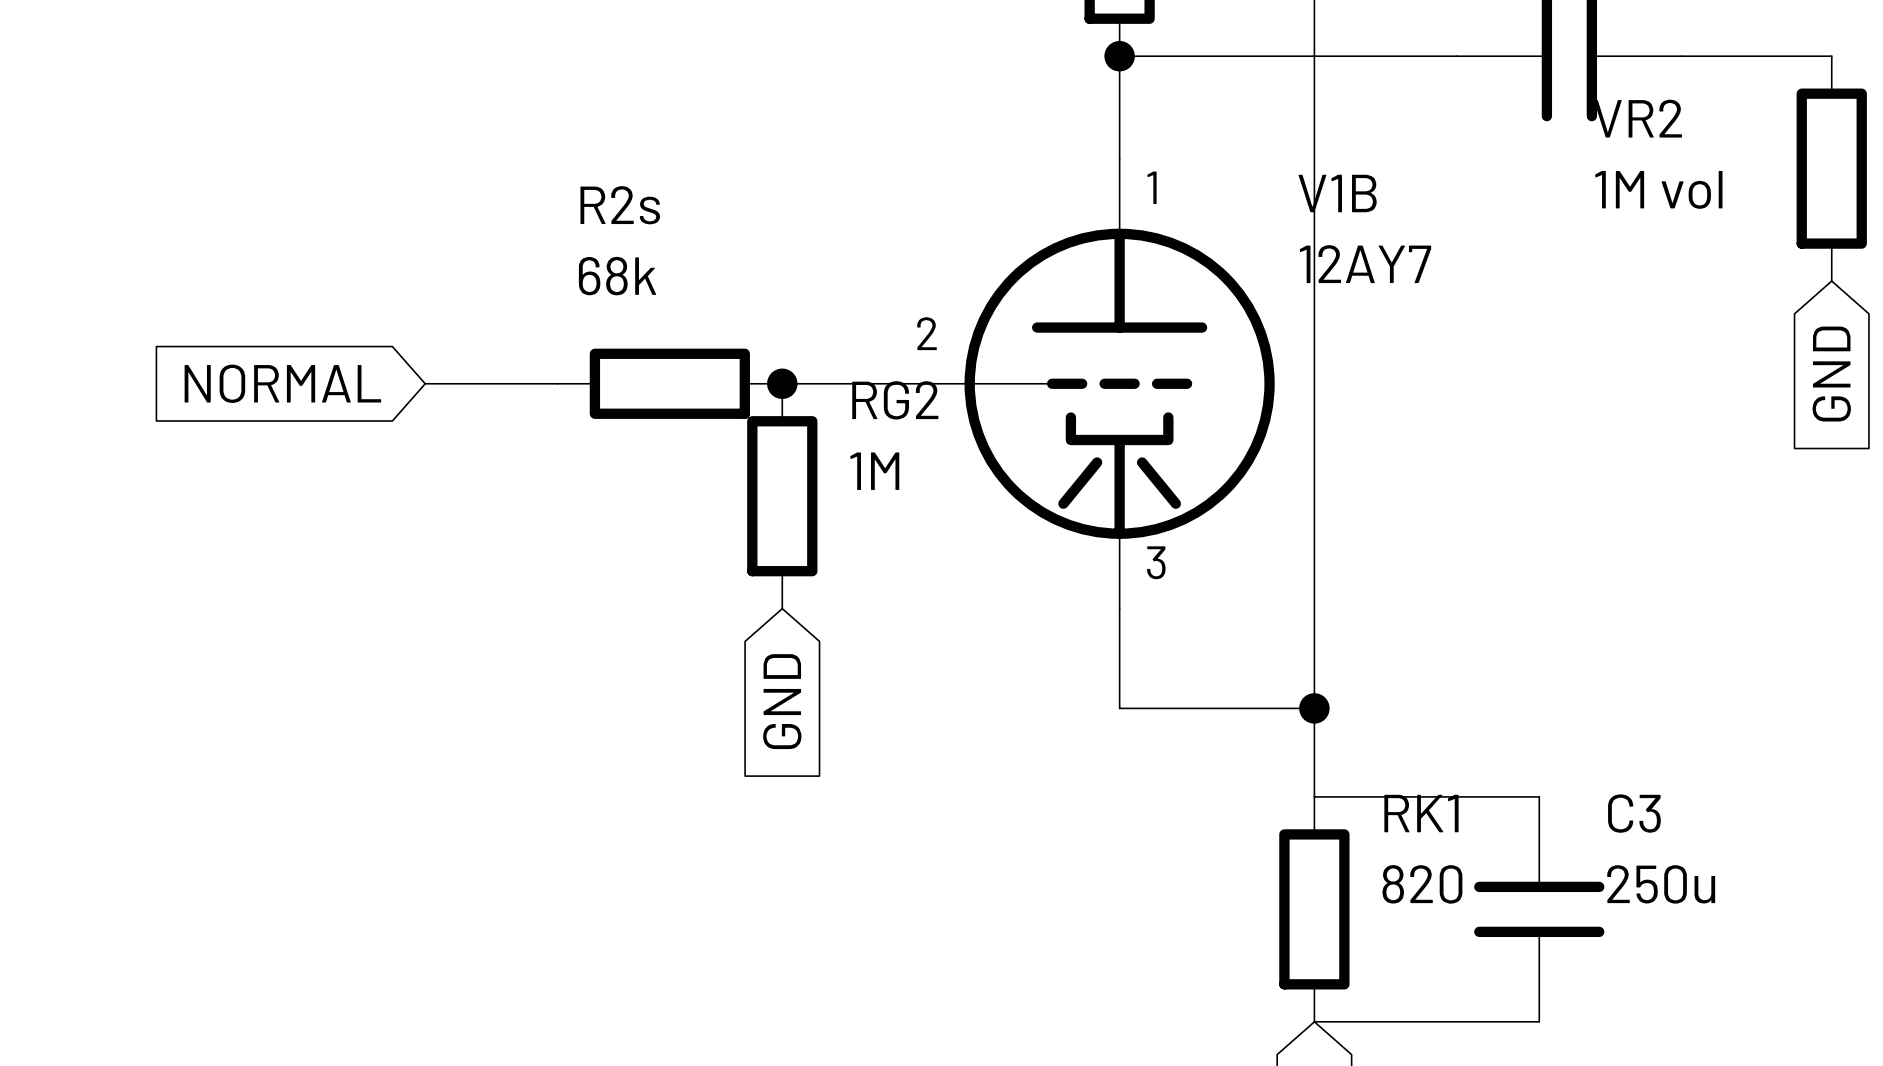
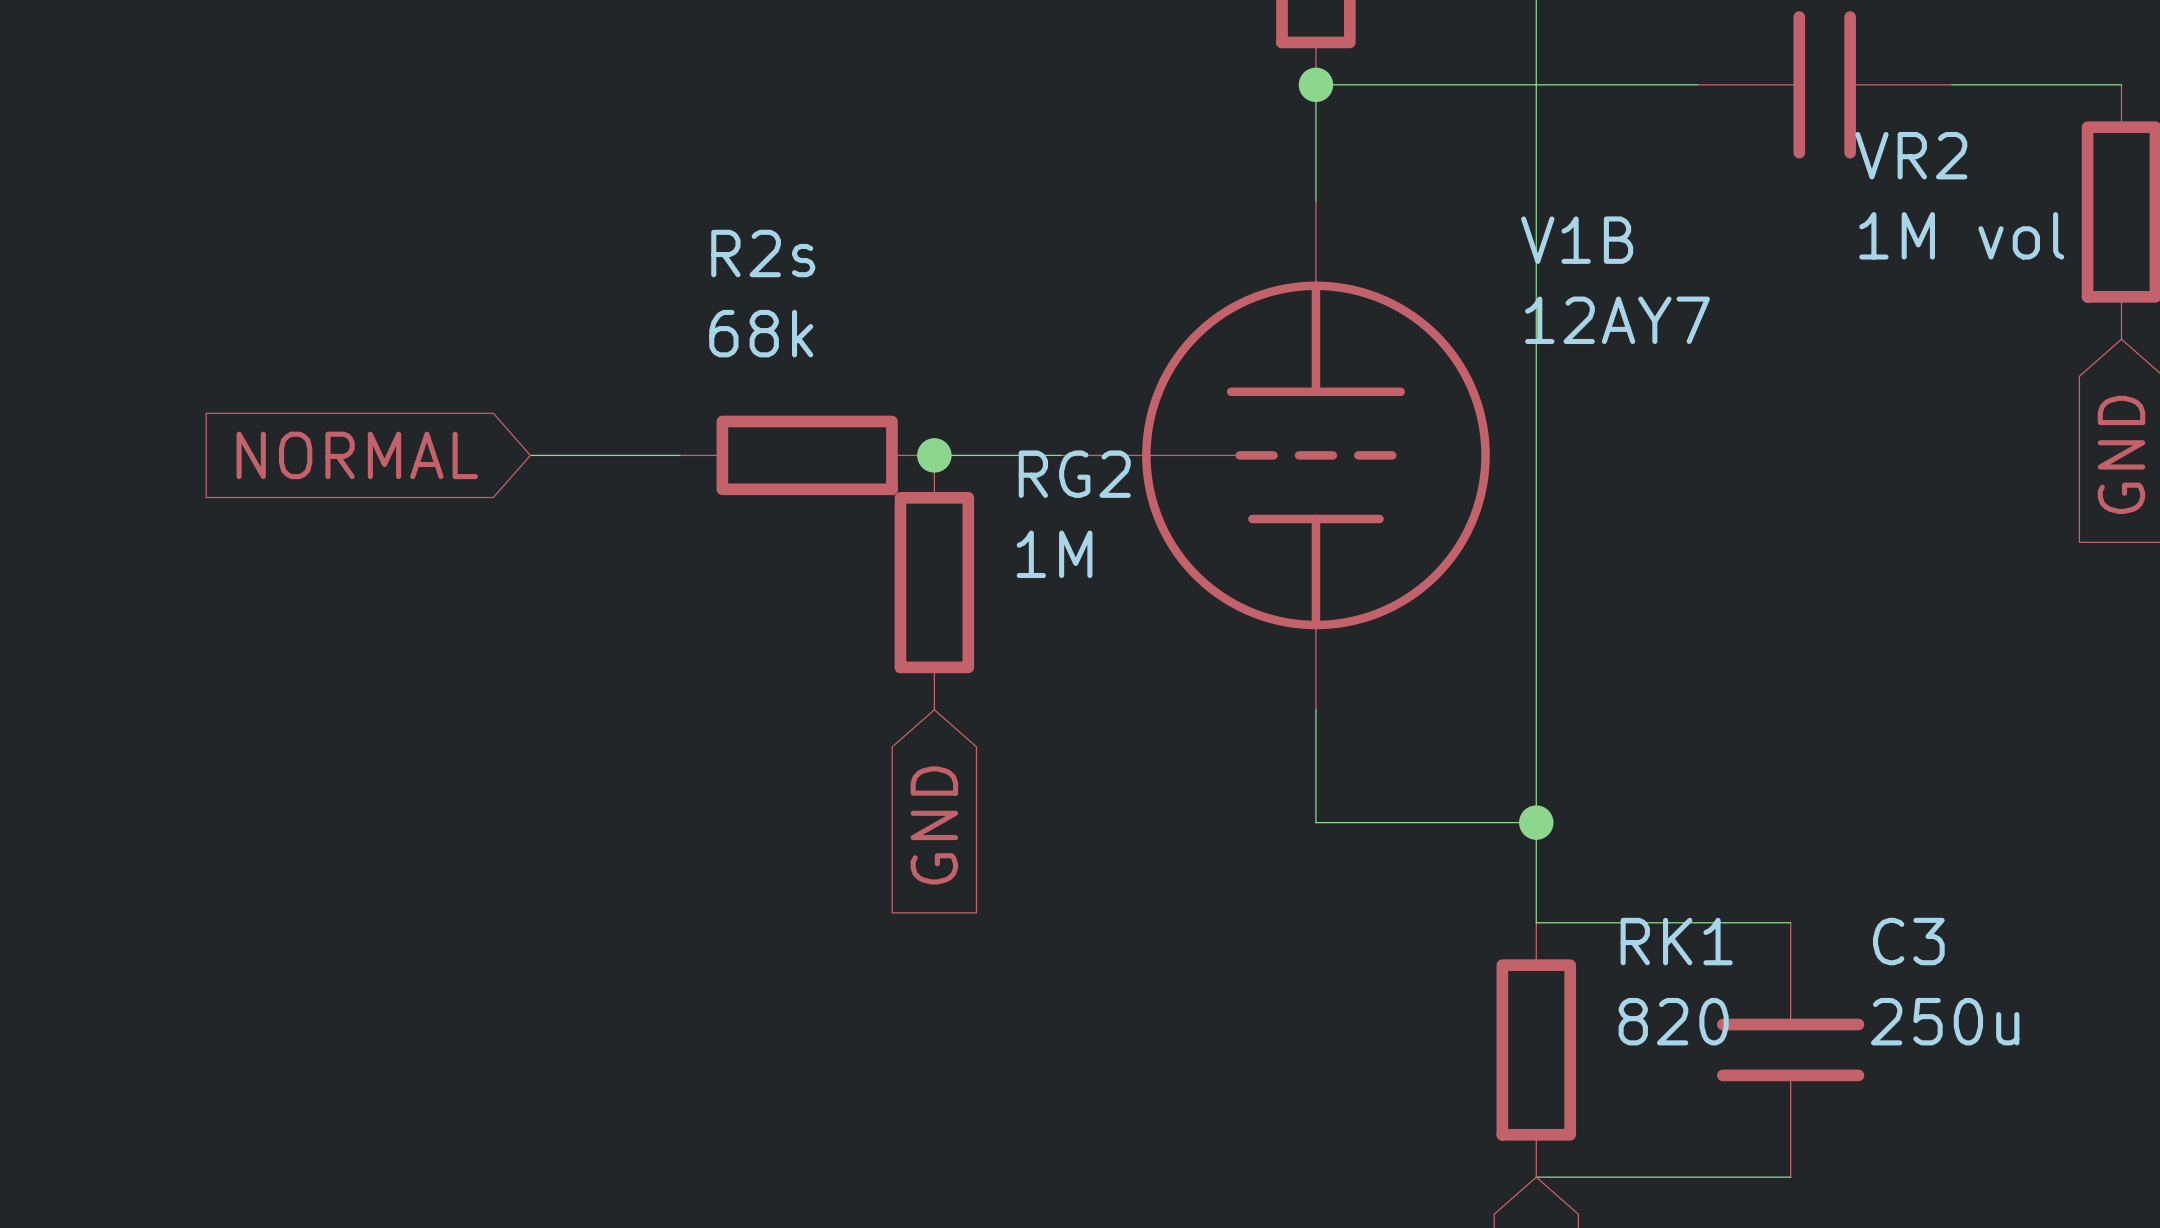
V1B symbol: [894, 158, 1275, 609] -> [1061, 201, 1490, 710]
text: 1 (1152, 187) -> none
text: 2 (927, 333) -> none
text: 3 (1156, 562) -> none

